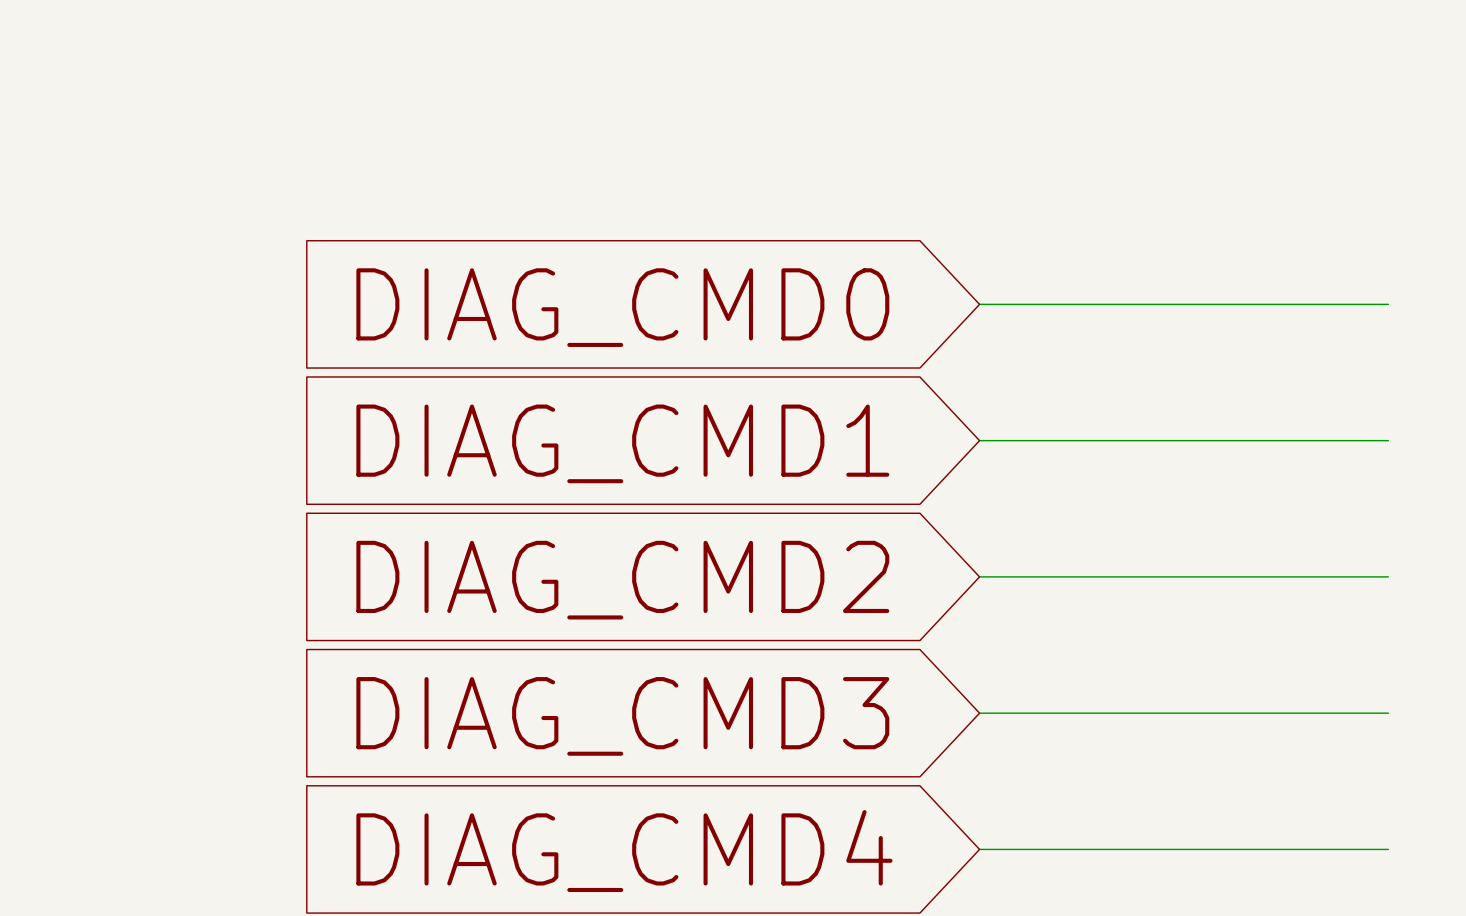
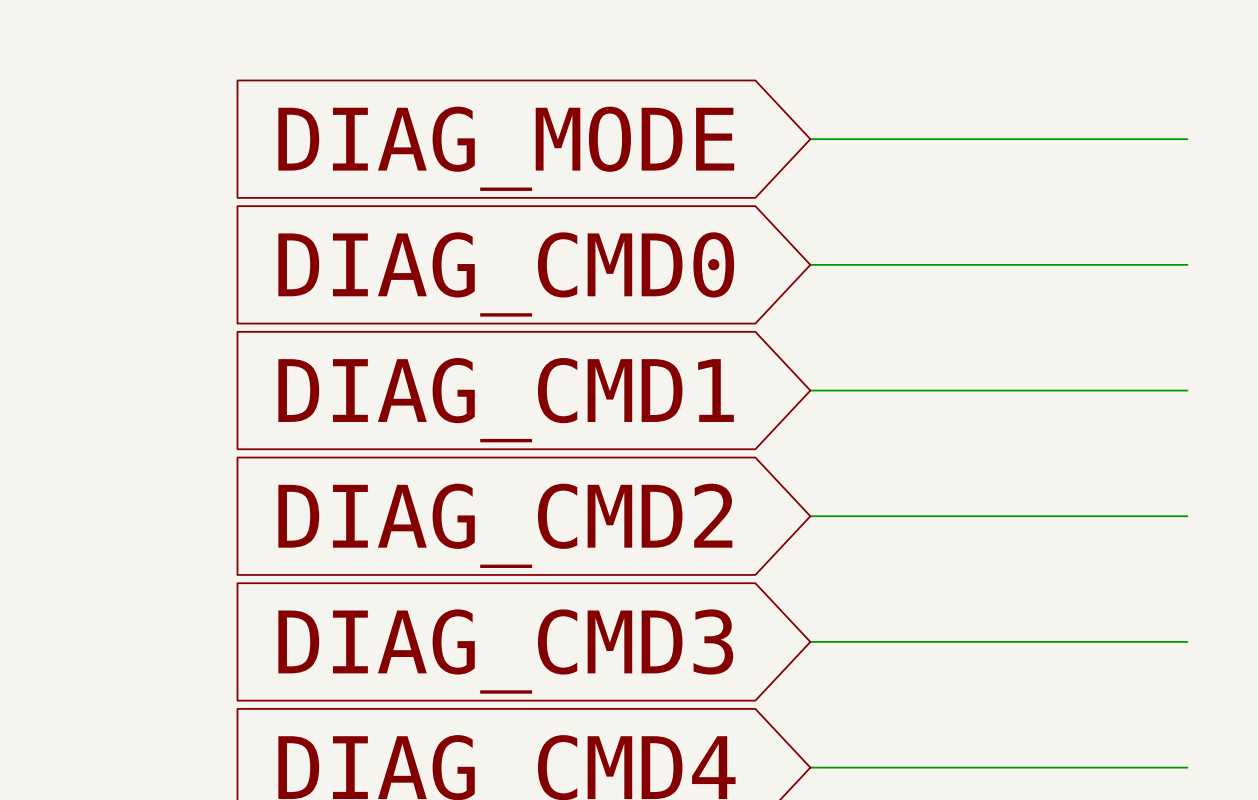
wire: none -> (810, 139) (1187, 139)
global label: none -> DIAG_MODE (506, 148)

